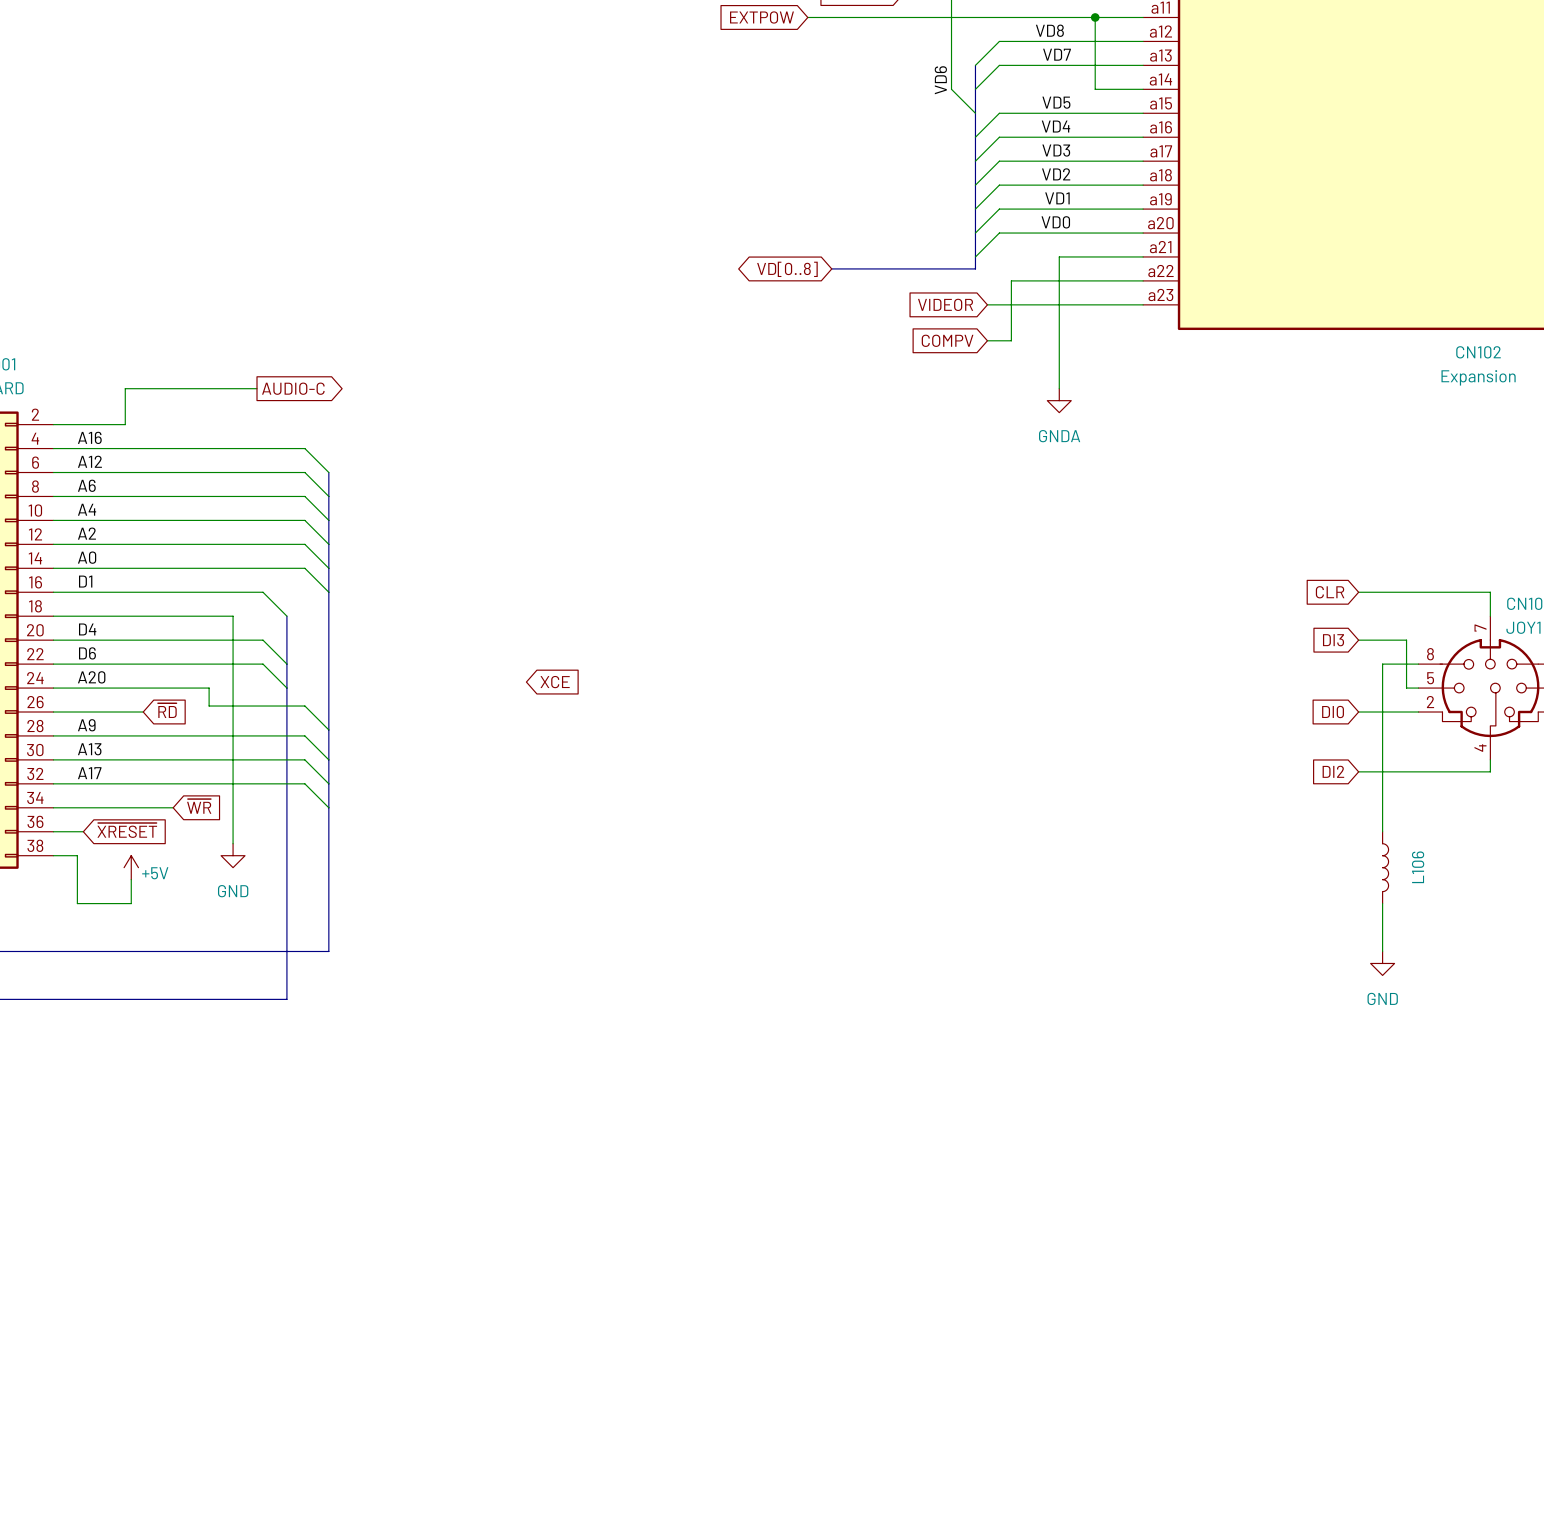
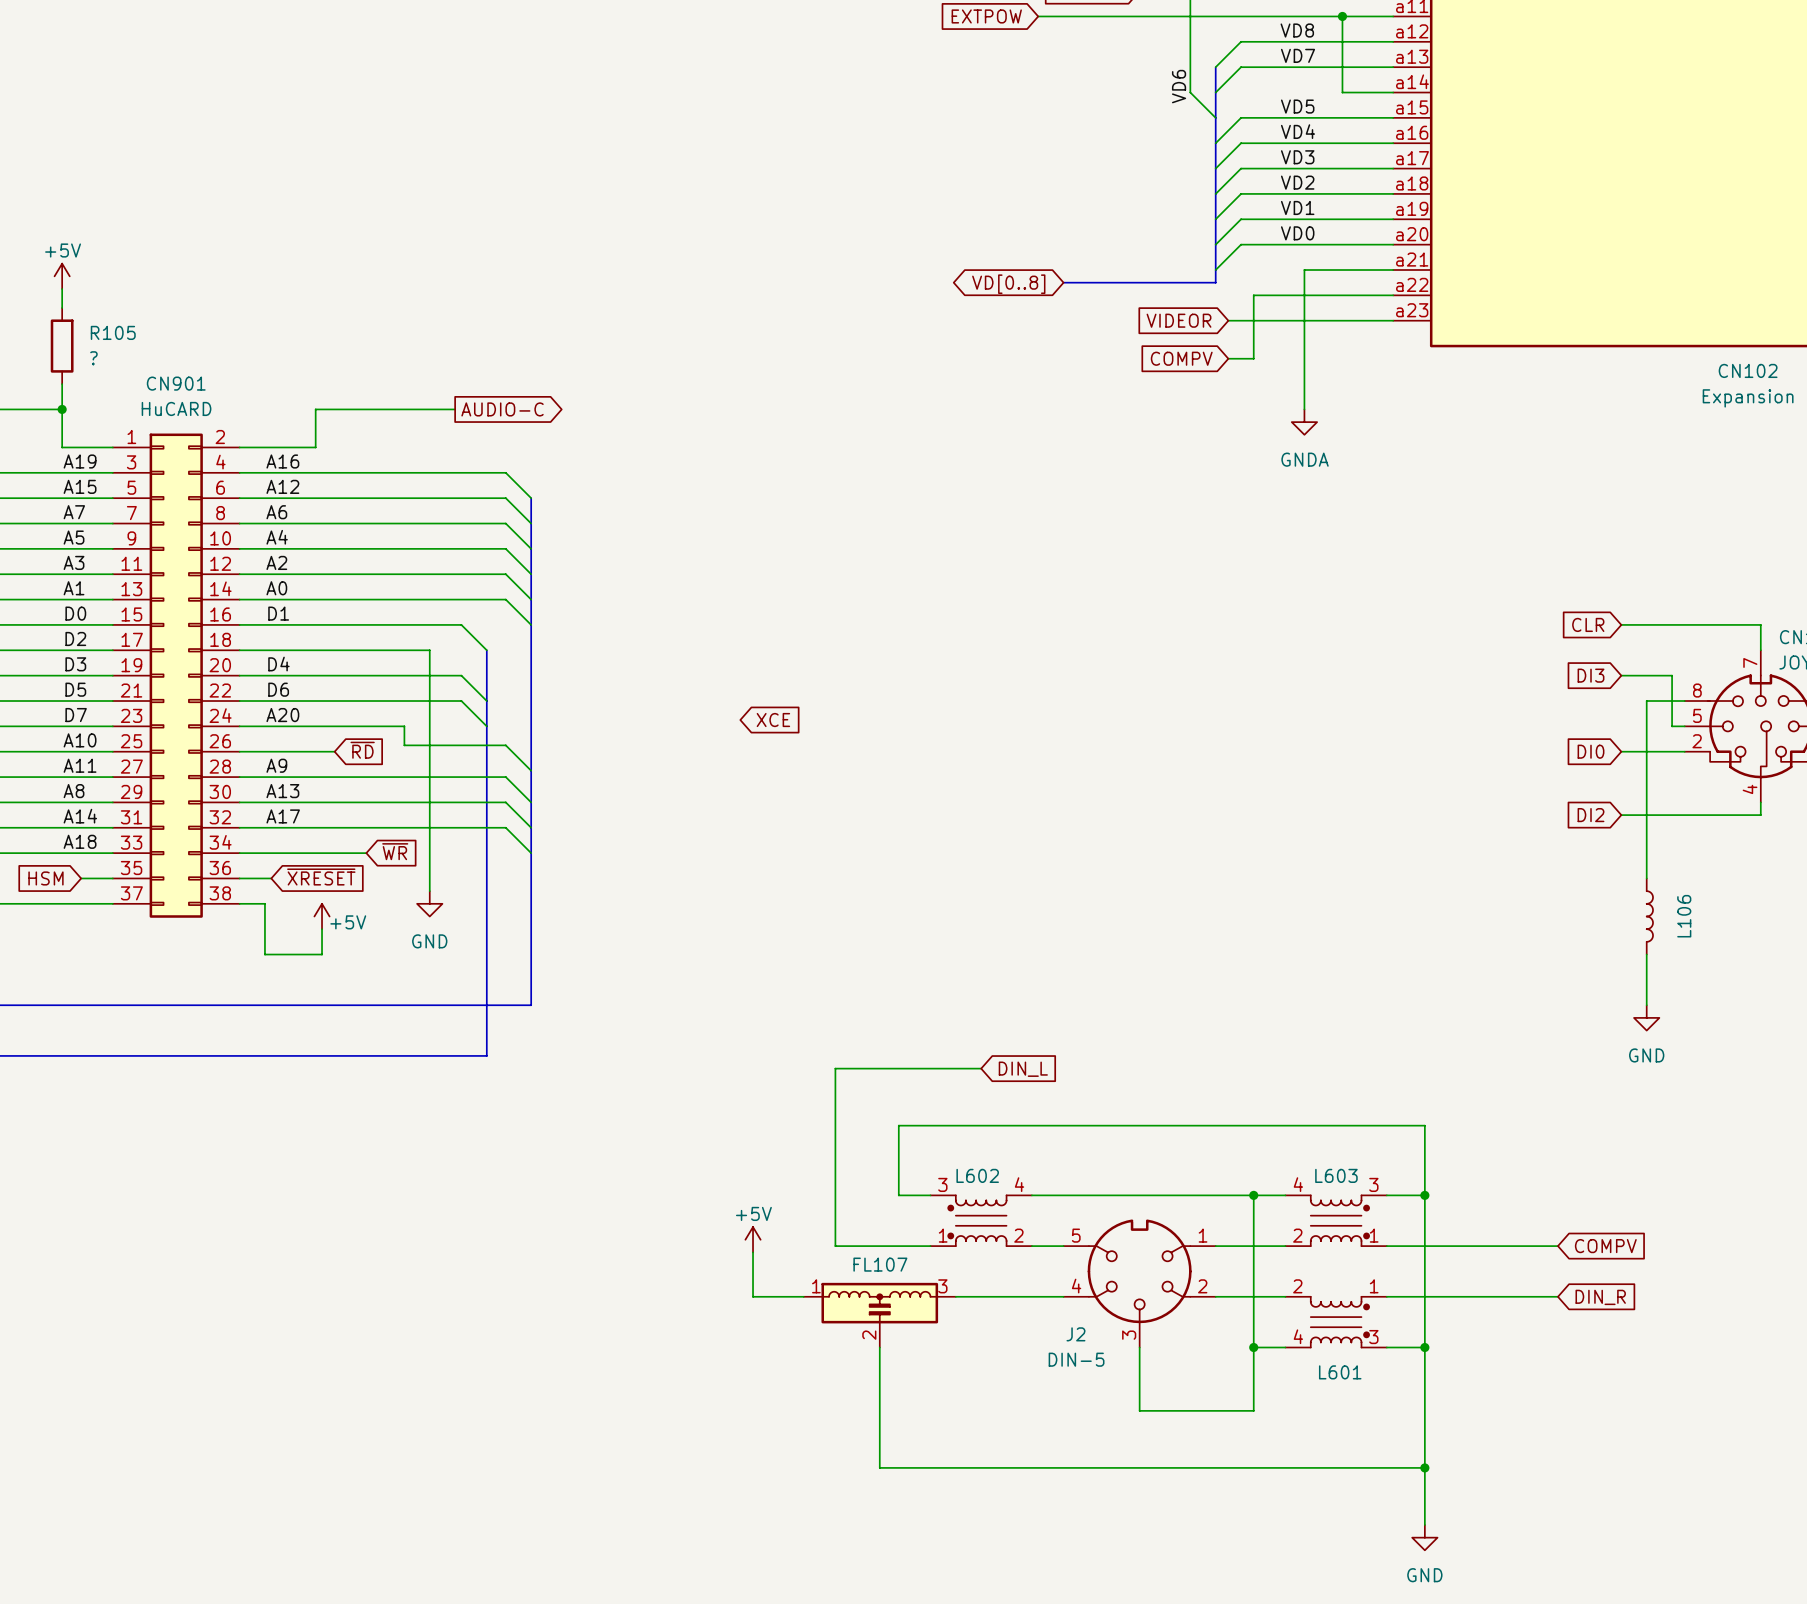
wire: none -> (981, 1068) (835, 1068) (835, 1246) (930, 1246)
global label: none -> DIN_L (1023, 1069)
wire: none -> (930, 1195) (898, 1195) (898, 1125) (1424, 1125) (1424, 1467)
wire: none -> (1031, 1195) (1285, 1195)
wire: none -> (1253, 1195) (1253, 1410) (1139, 1410) (1139, 1347)
junction: none -> (1253, 1195)
wire: none -> (1386, 1195) (1424, 1195)
junction: none -> (1424, 1195)
L602: none -> (981, 1220)
L603: none -> (1336, 1220)
power symbol: none -> +5V (753, 1239)
wire: none -> (1031, 1246) (1063, 1246)
wire: none -> (1215, 1246) (1285, 1246)
wire: none -> (1386, 1246) (1557, 1246)
global label: none -> COMPV (1605, 1246)
wire: none -> (753, 1252) (753, 1296) (803, 1296)
J2: none -> DIN-5 (1139, 1283)
wire: none -> (955, 1296) (1063, 1296)
wire: none -> (1215, 1296) (1285, 1296)
wire: none -> (1386, 1296) (1557, 1296)
global label: none -> DIN_R (1600, 1297)
FL107: none -> (879, 1315)
L601: none -> (1336, 1322)
wire: none -> (879, 1347) (879, 1467) (1424, 1467)
wire: none -> (1253, 1347) (1285, 1347)
junction: none -> (1253, 1347)
wire: none -> (1386, 1347) (1424, 1347)
junction: none -> (1424, 1347)
wire: none -> (1424, 1467) (1424, 1524)
junction: none -> (1424, 1467)
power symbol: none -> GND (1424, 1537)

